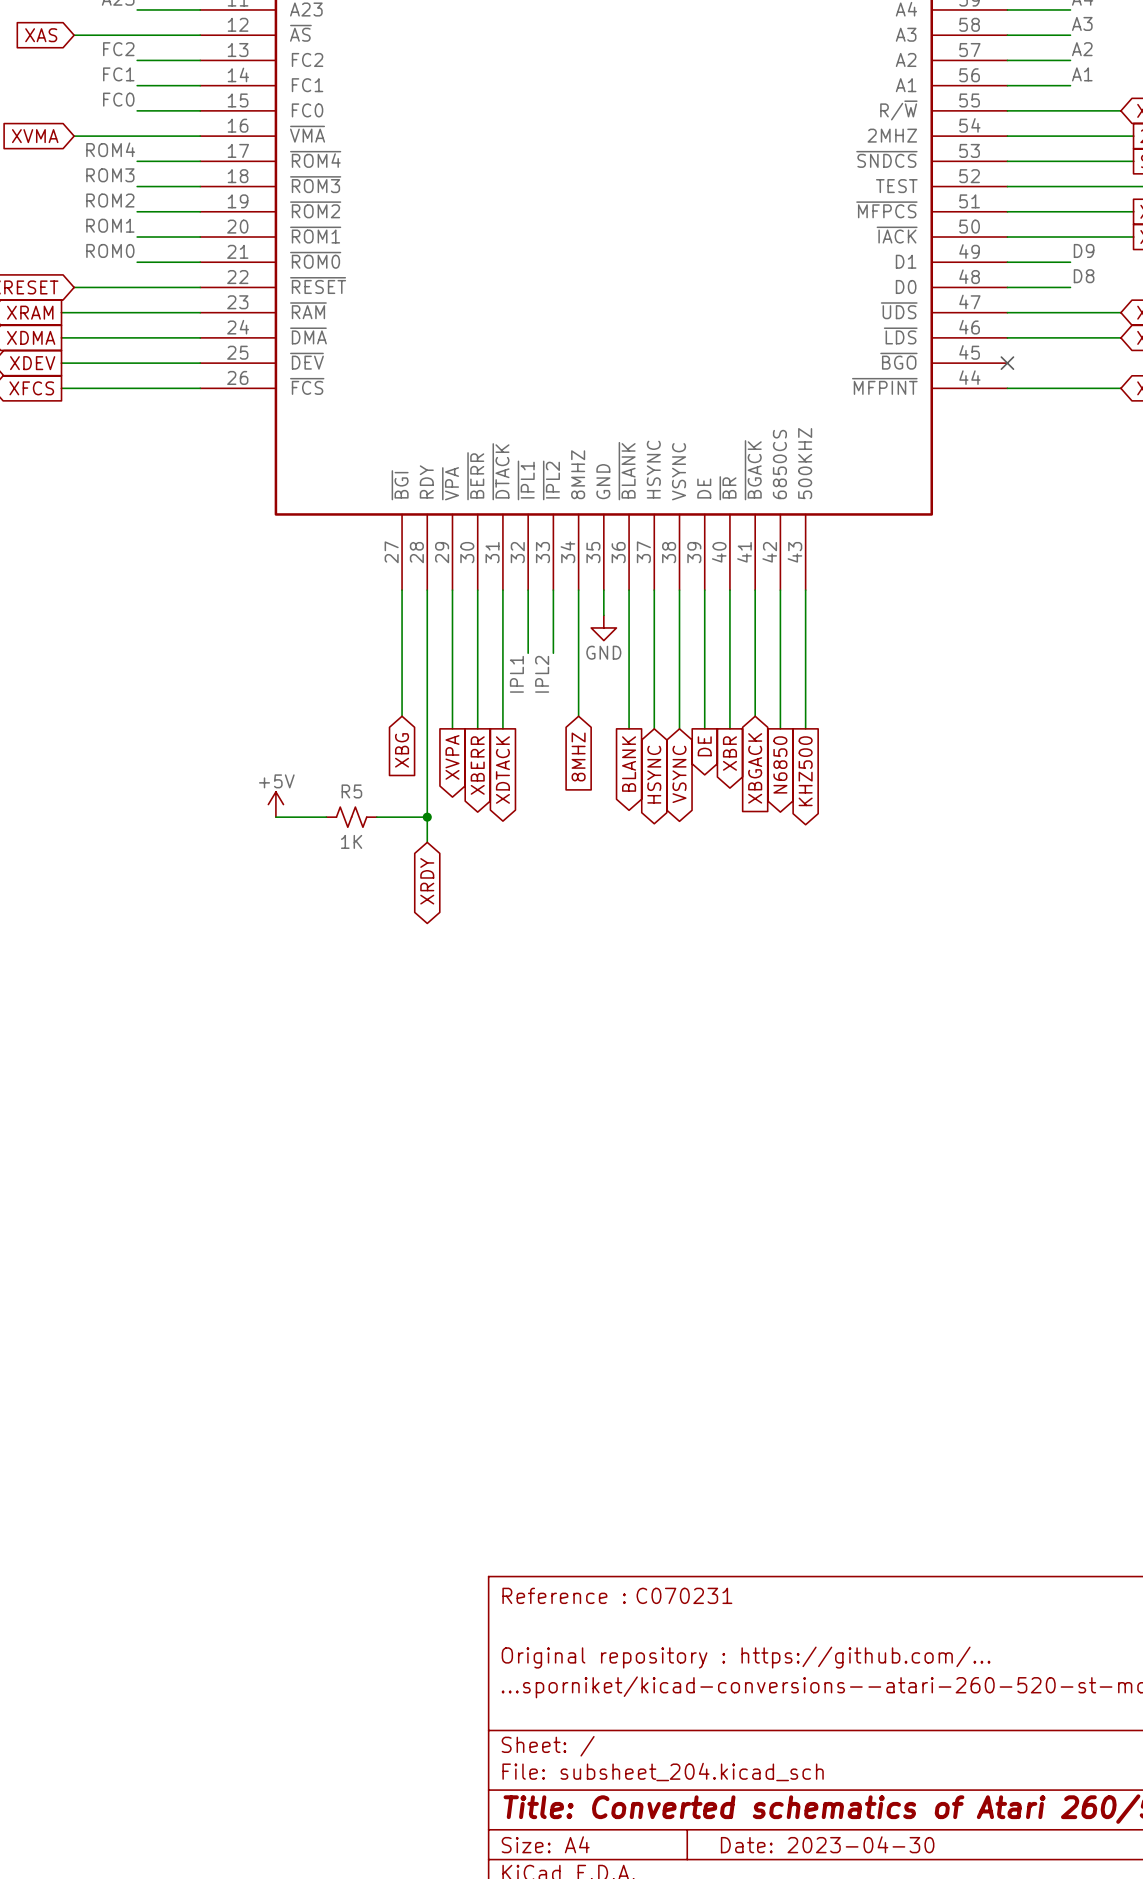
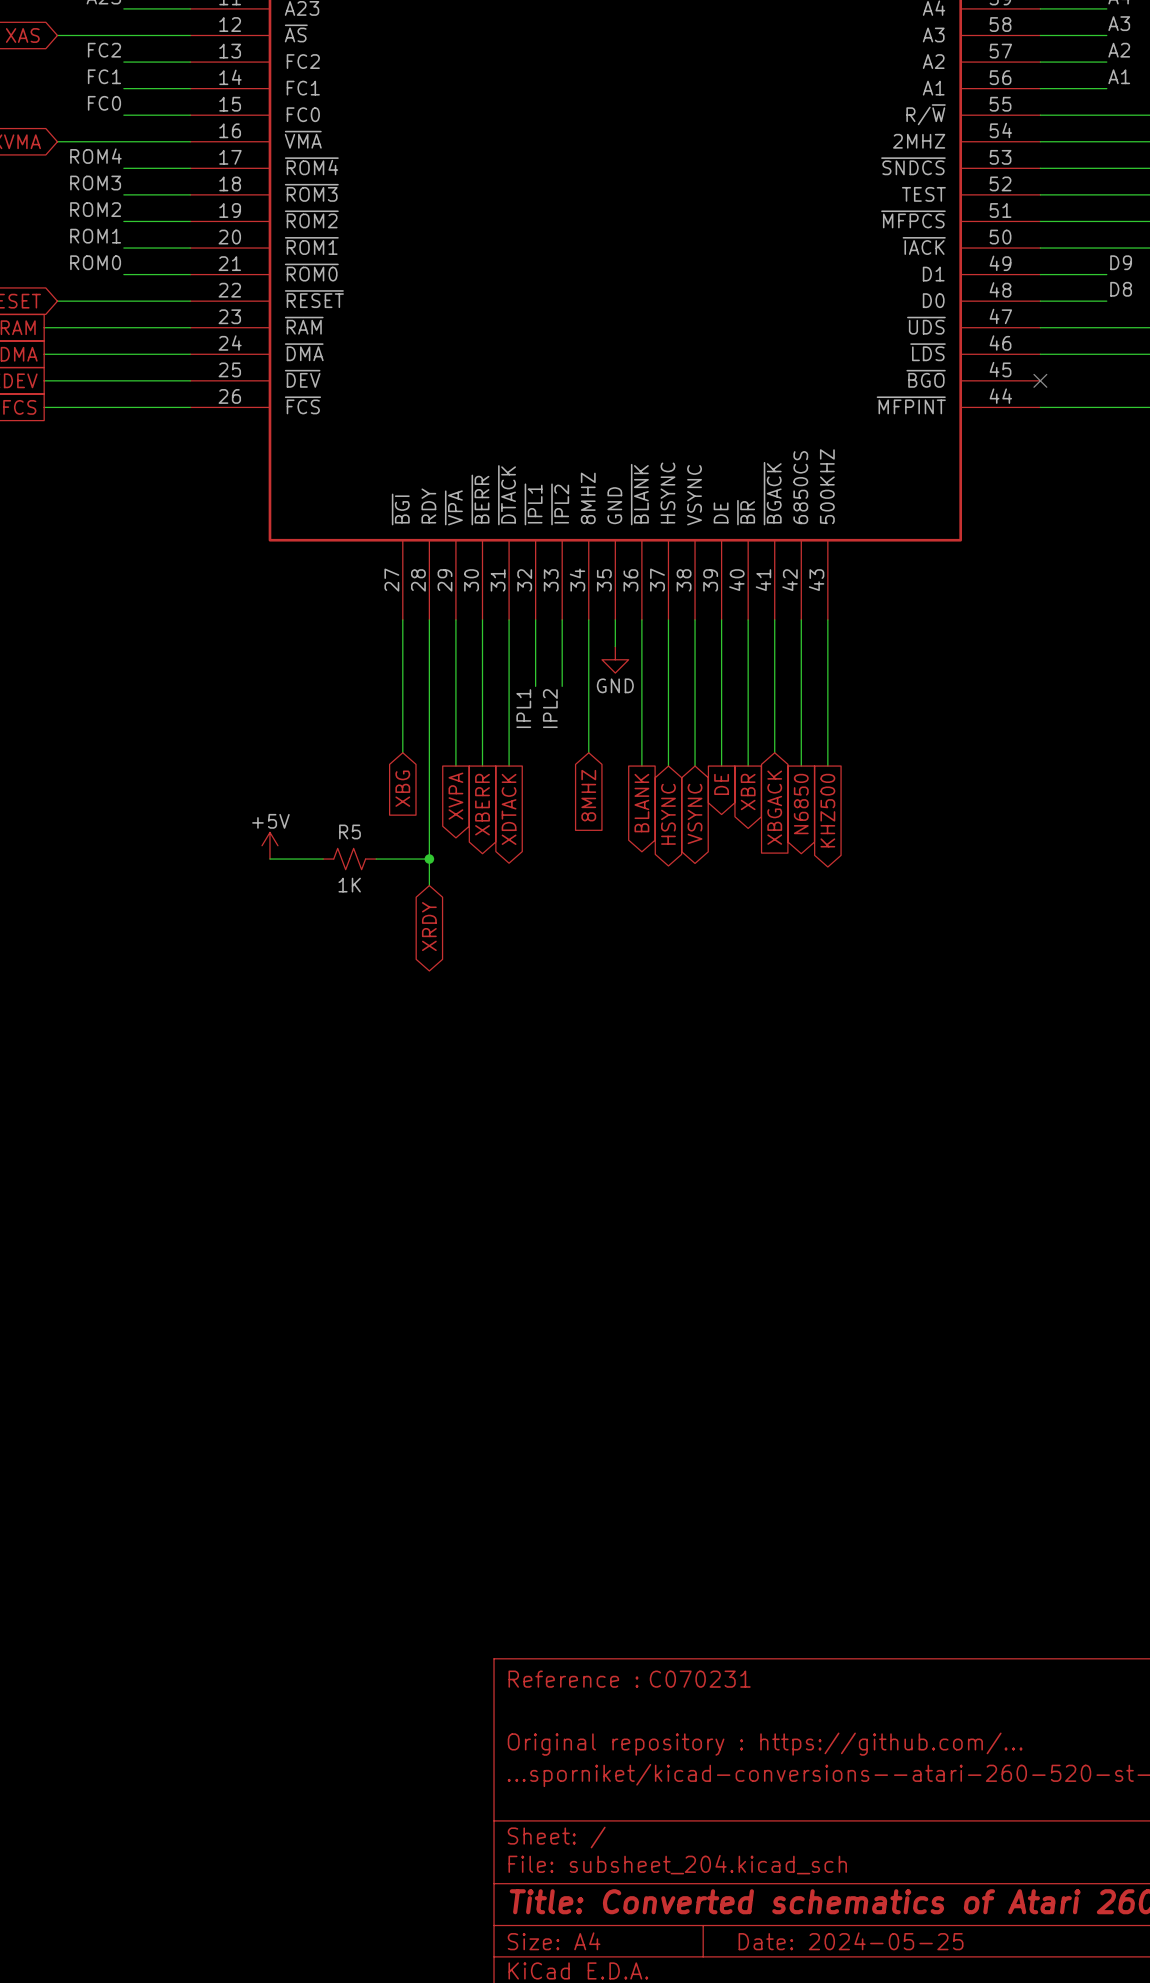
title block: Date: 2023-04-30 (827, 1844) -> Date: 2024-05-25 (851, 1941)

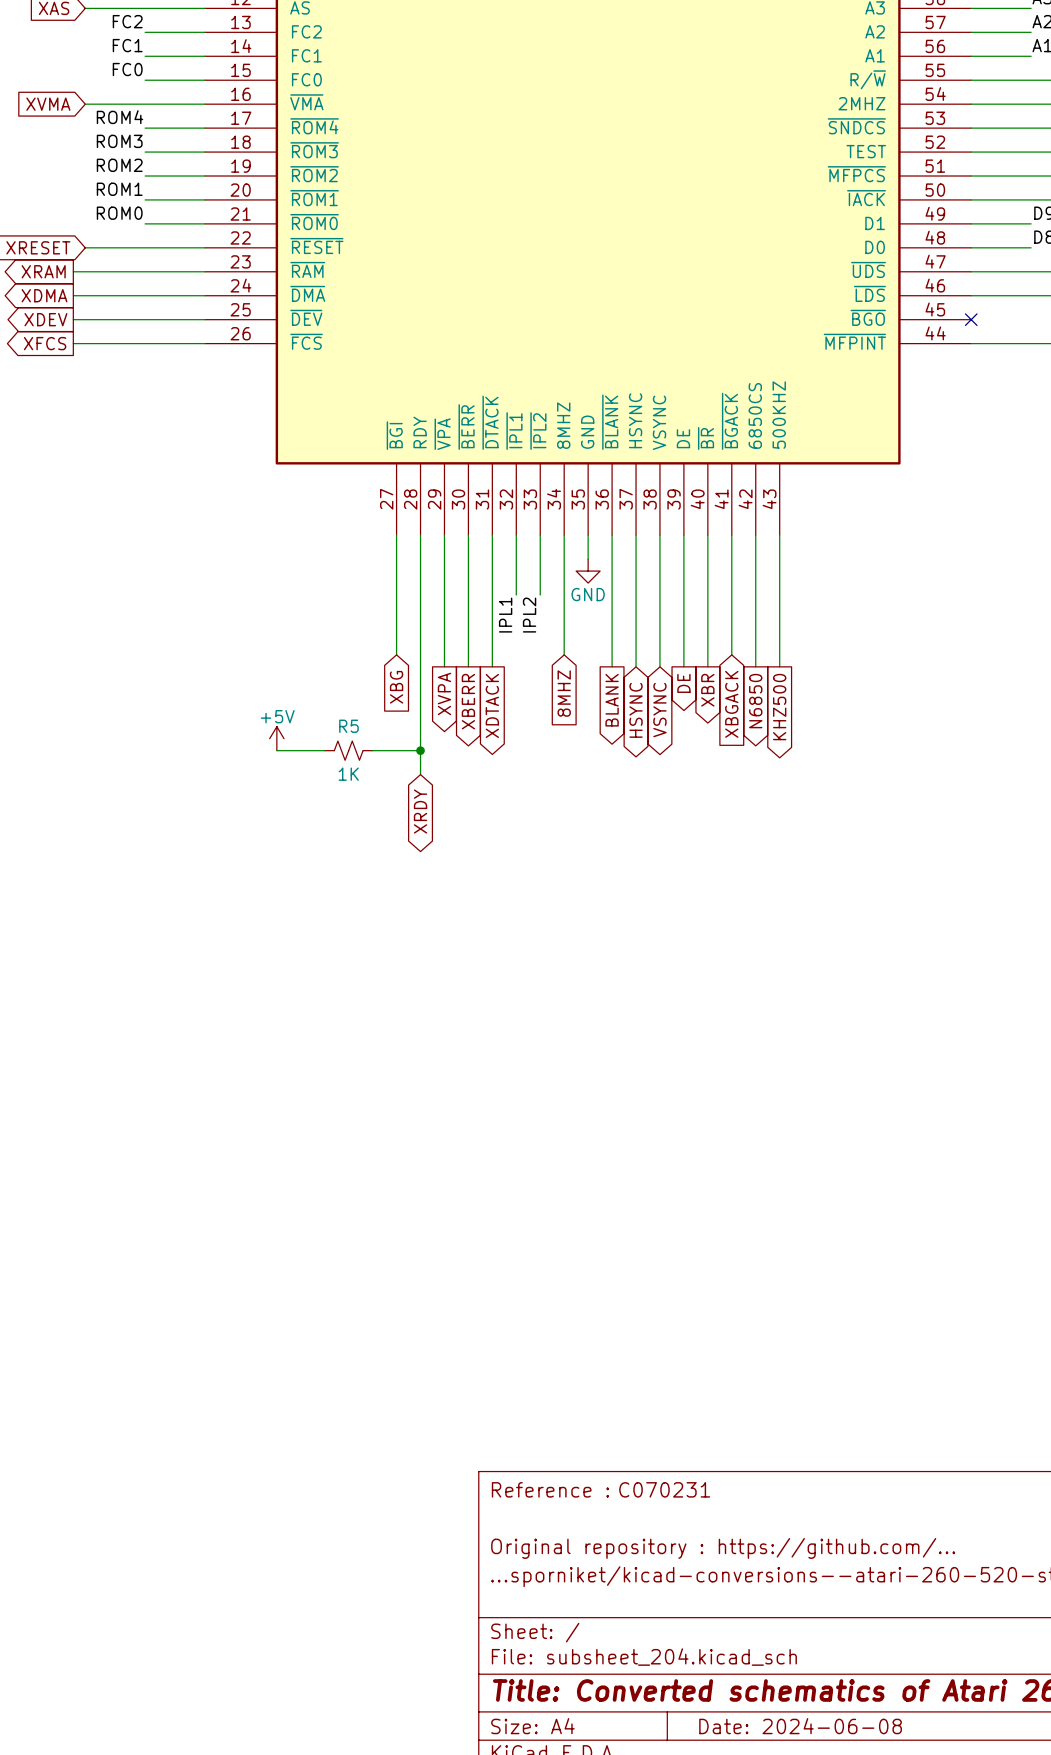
title block: Date: 2024-05-25 (851, 1941) -> Date: 2024-06-08 (800, 1726)

